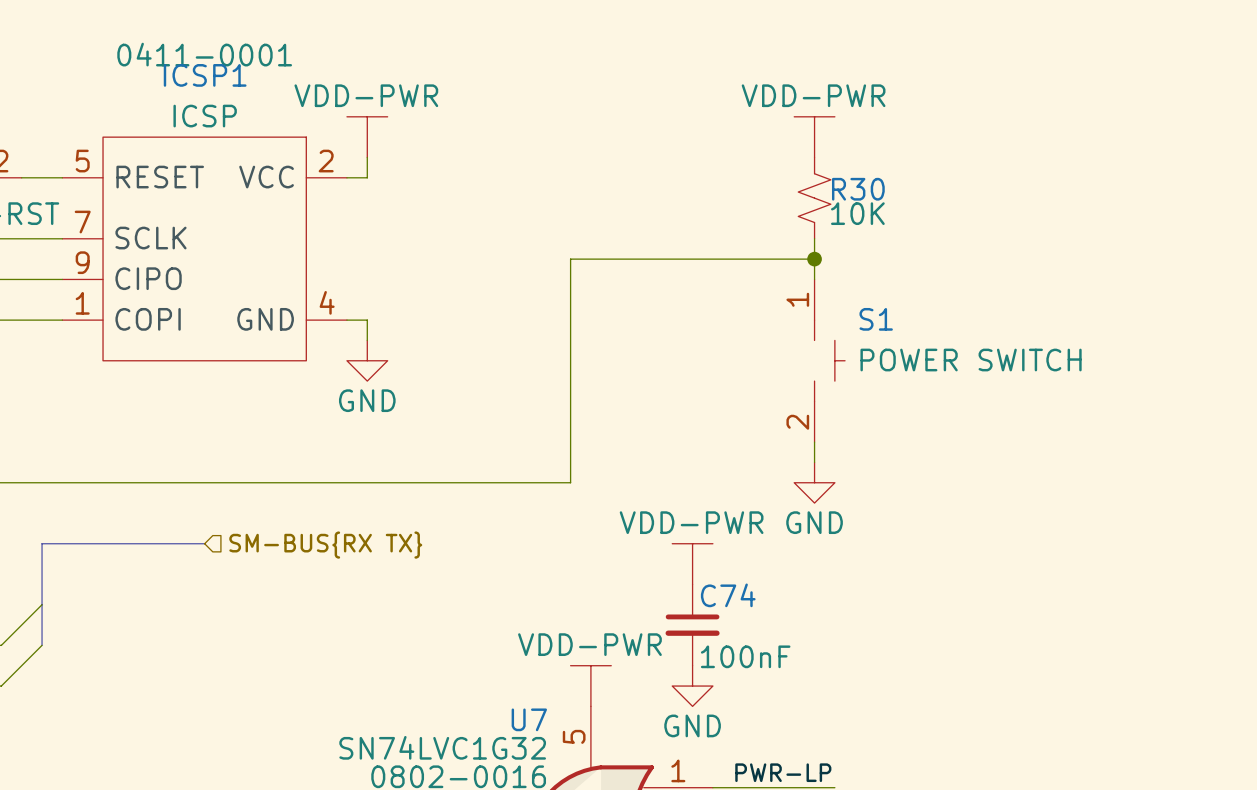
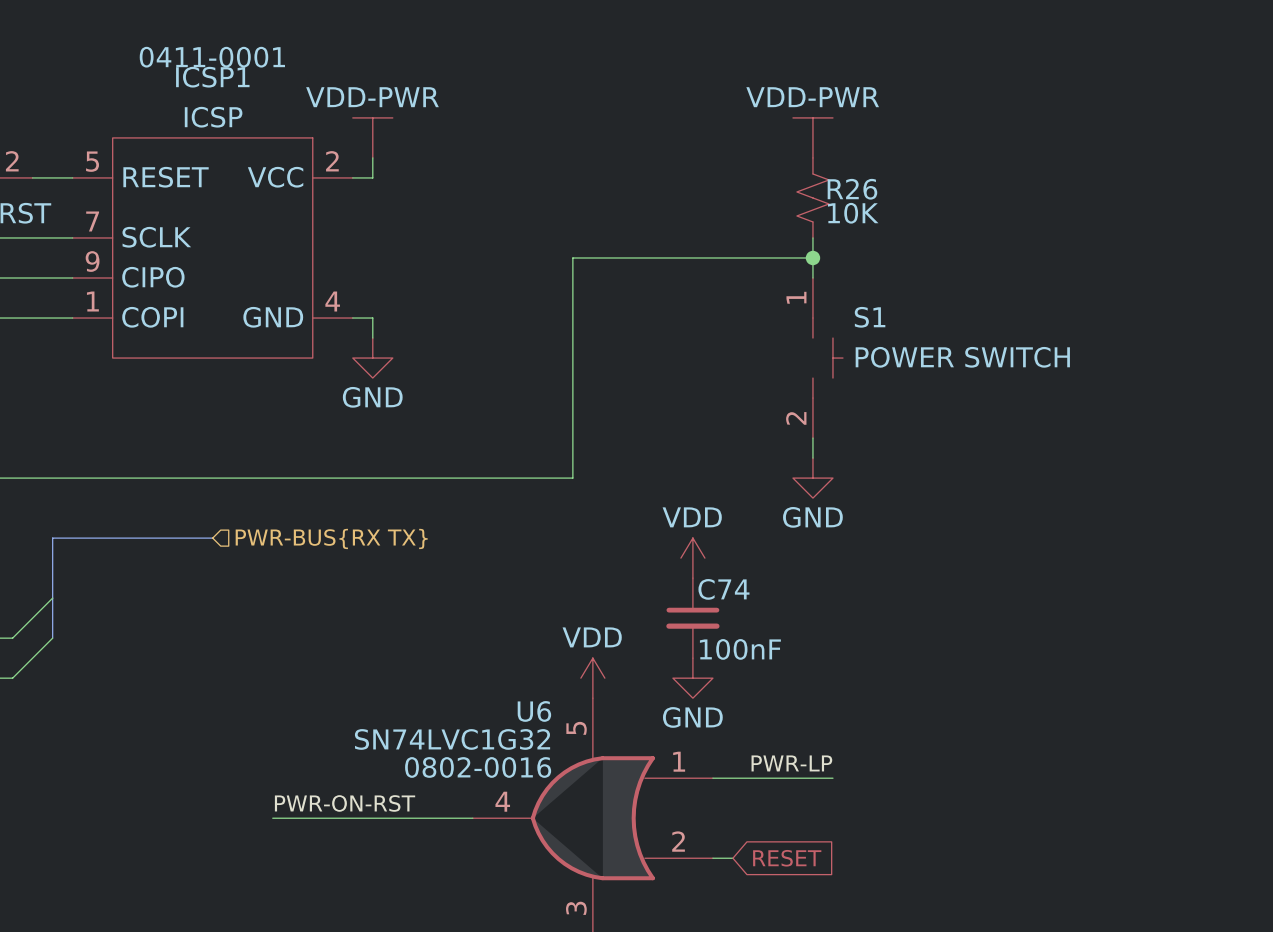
R30 name: R30 (858, 189) -> R26 (852, 189)
hierarchical label: SM-BUS{RX TX} (325, 545) -> PWR-BUS{RX TX} (331, 538)
power symbol: VDD-PWR (692, 564) -> VDD (692, 558)
power symbol: VDD-PWR (590, 686) -> VDD (592, 678)
U7 name: U7 (529, 719) -> U6 (534, 711)

